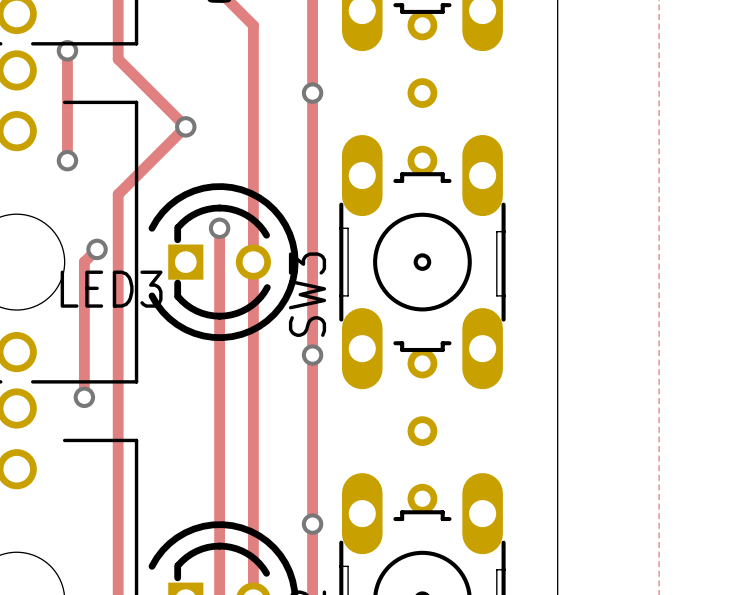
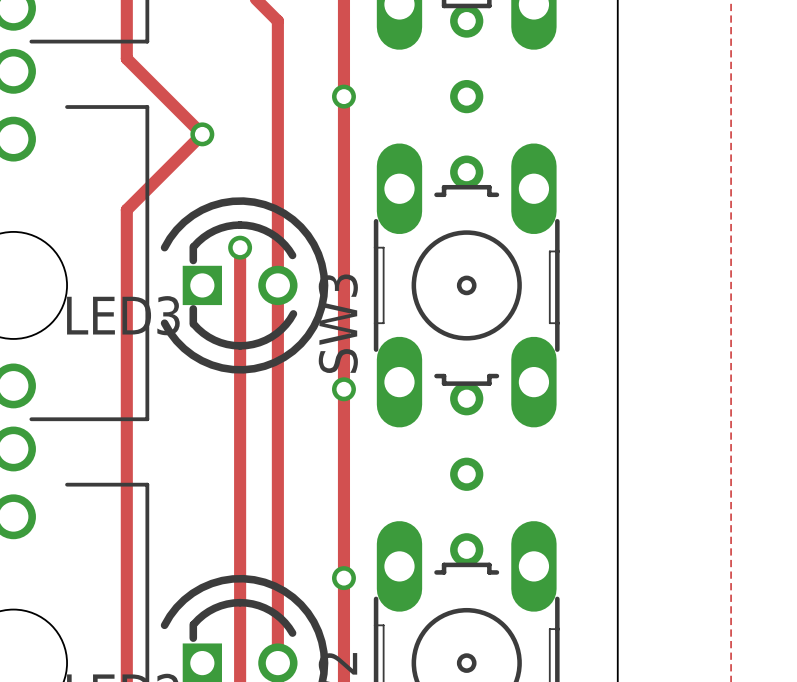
track: (67, 50) (67, 160) -> none
via: (67, 50) -> none
via: (67, 160) -> none
track: (97, 249) (84, 262) (84, 397) -> none
via: (97, 249) -> none
via: (84, 397) -> none

